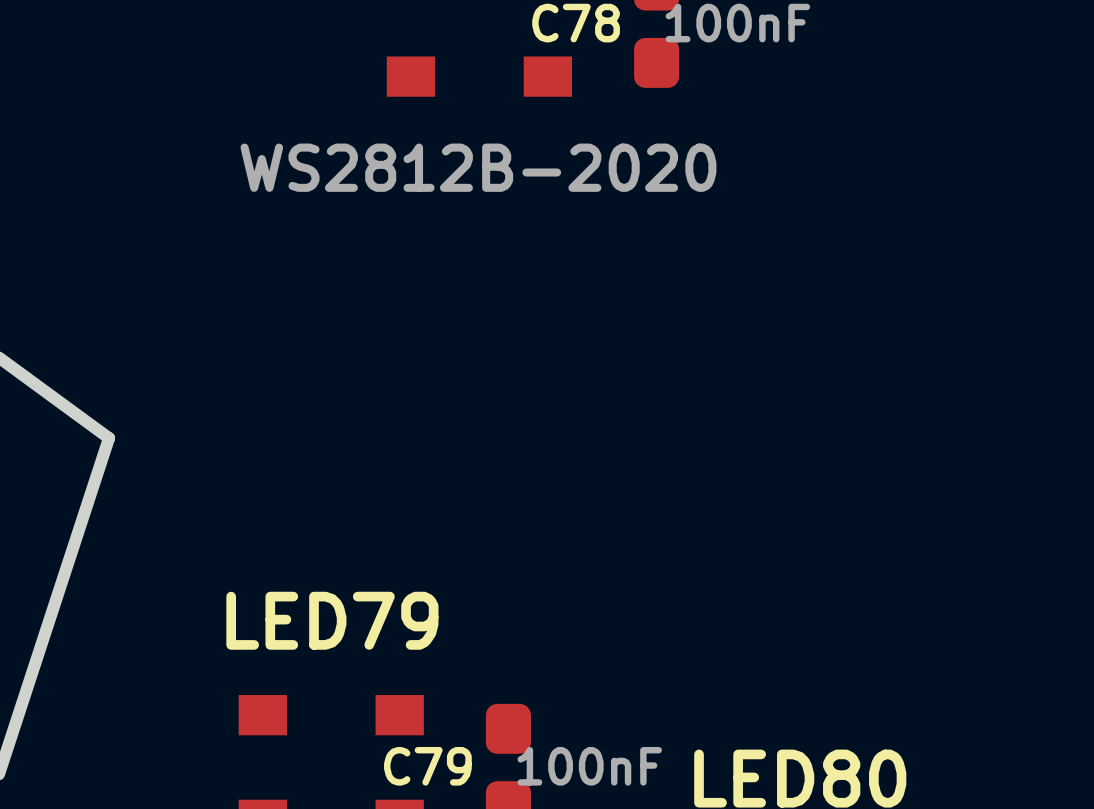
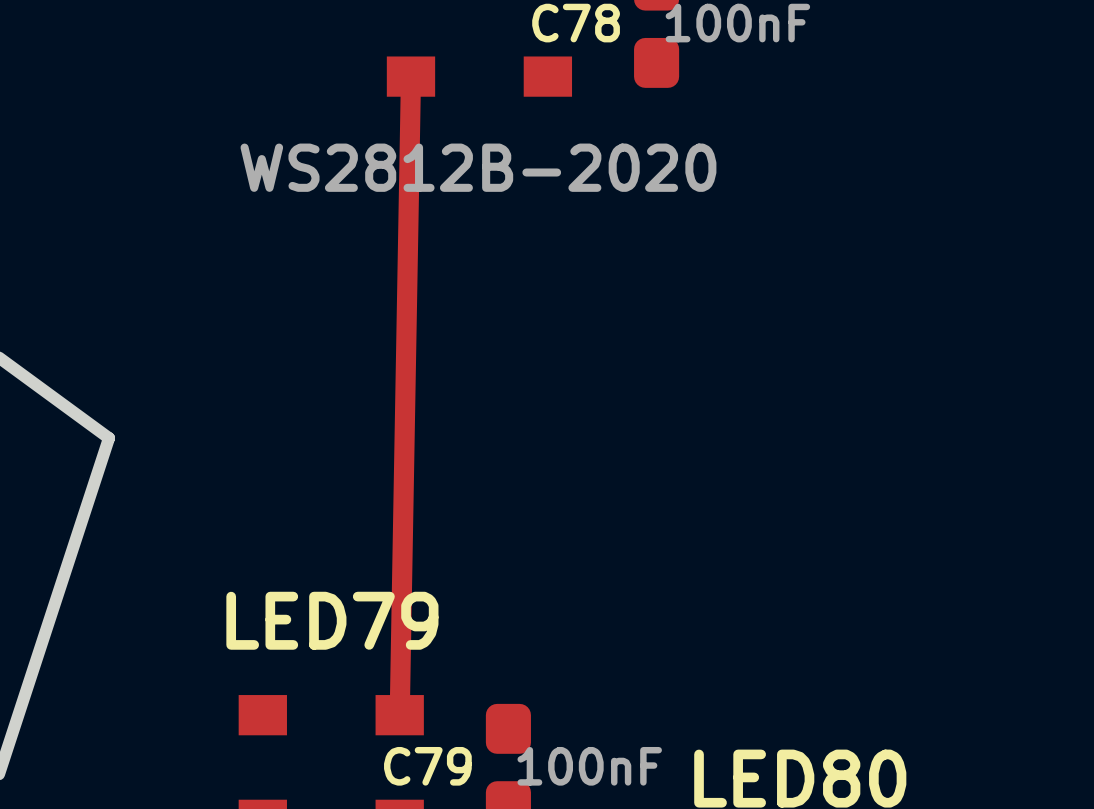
top track: none -> (410, 76) (399, 715)

